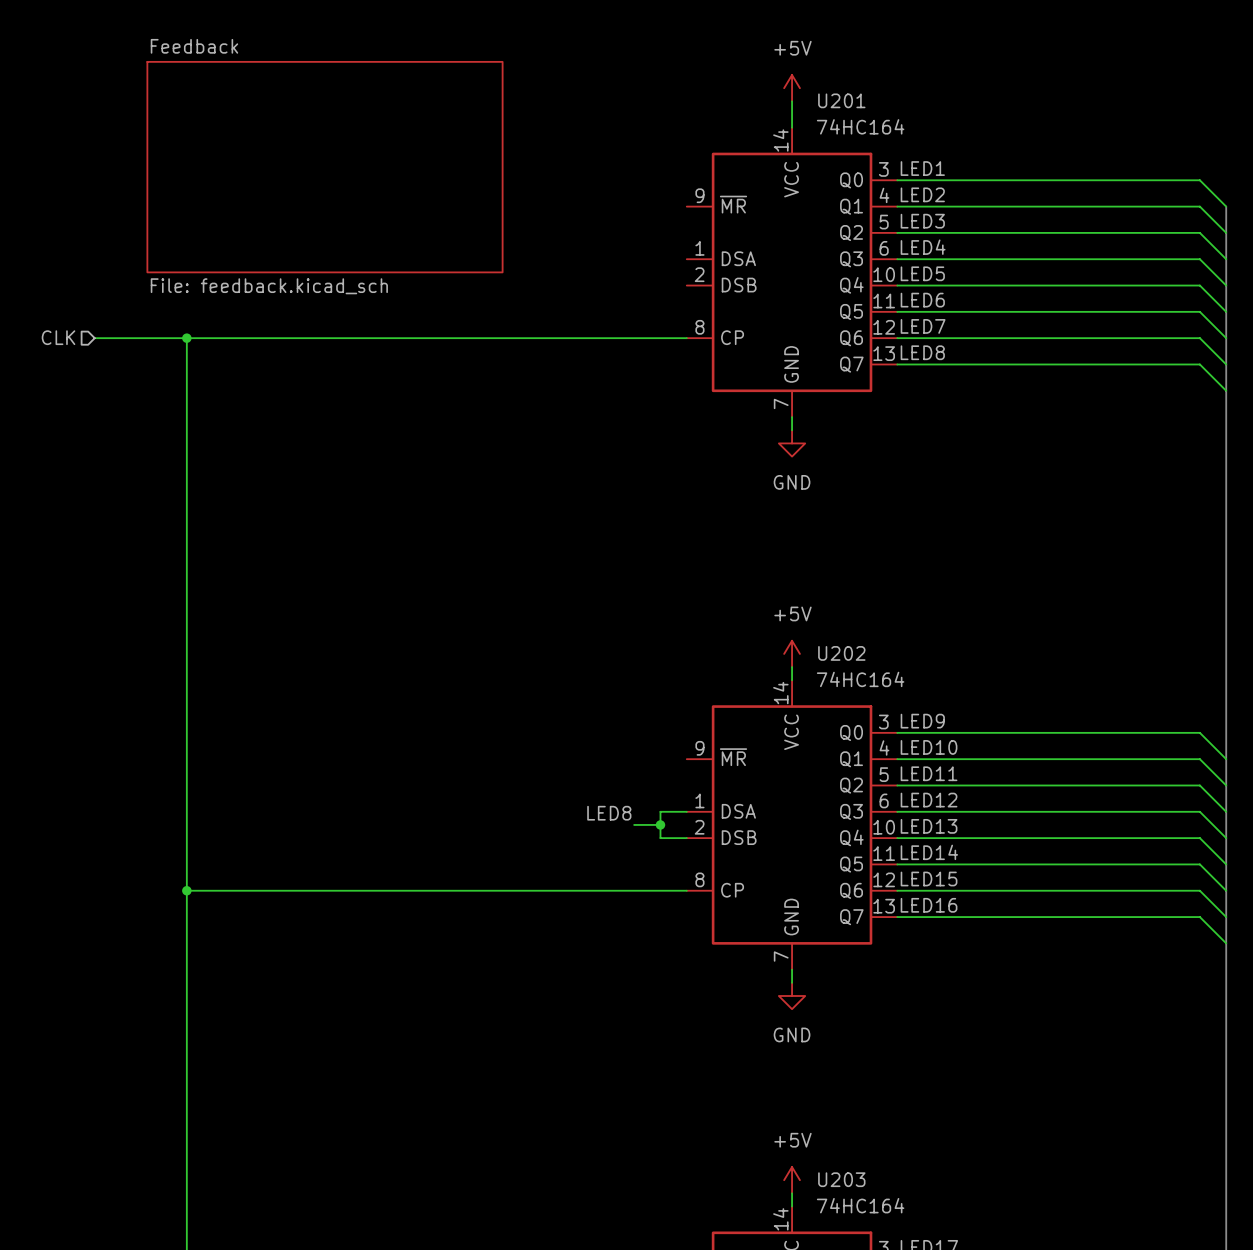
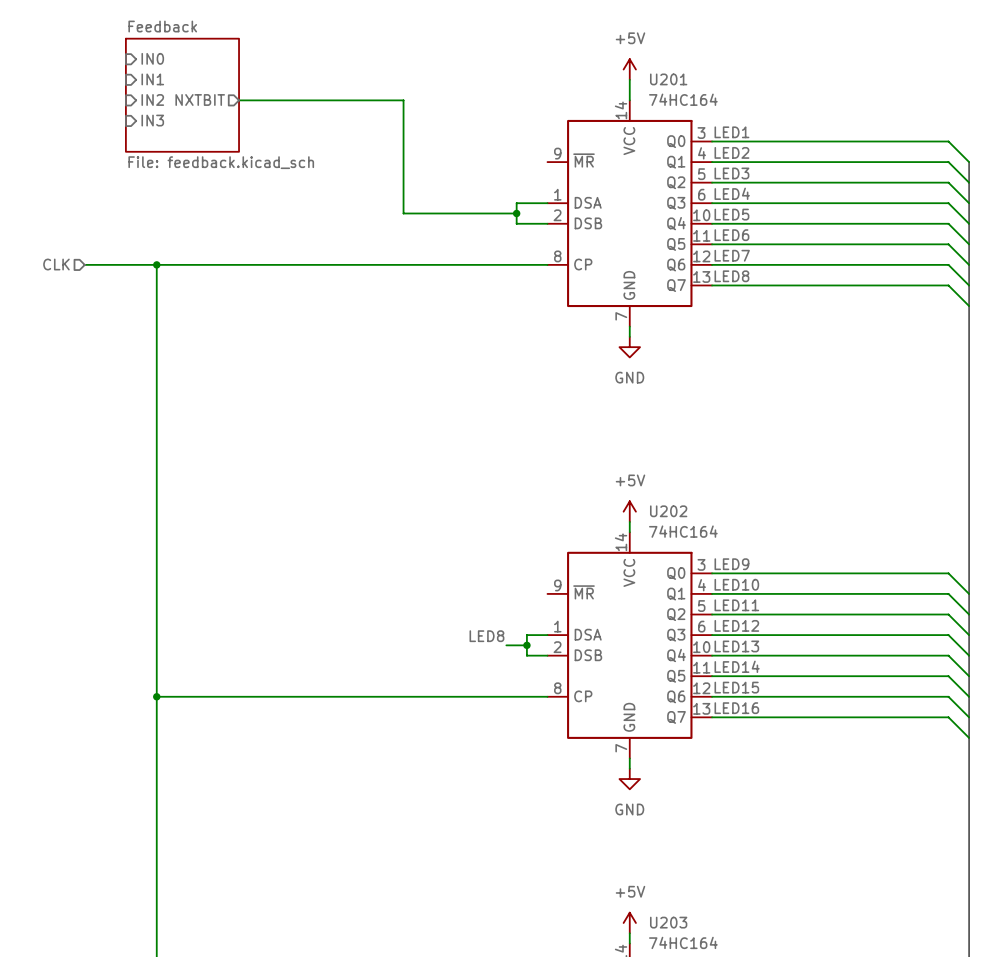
sheet pin: none -> IN0 (152, 58)
sheet pin: none -> IN1 (152, 79)
sheet Feedback: none -> File: feedback.kicad_sch (182, 95)
sheet pin: none -> IN2 (152, 99)
sheet pin: none -> NXTBIT (200, 99)
wire: none -> (239, 100) (403, 100) (403, 213) (516, 213)
sheet pin: none -> IN3 (152, 120)
sheet Feedback: File: feedback.kicad_sch (324, 167) -> none
wire: none -> (547, 203) (516, 203) (516, 223) (547, 223)
junction: none -> (516, 213)

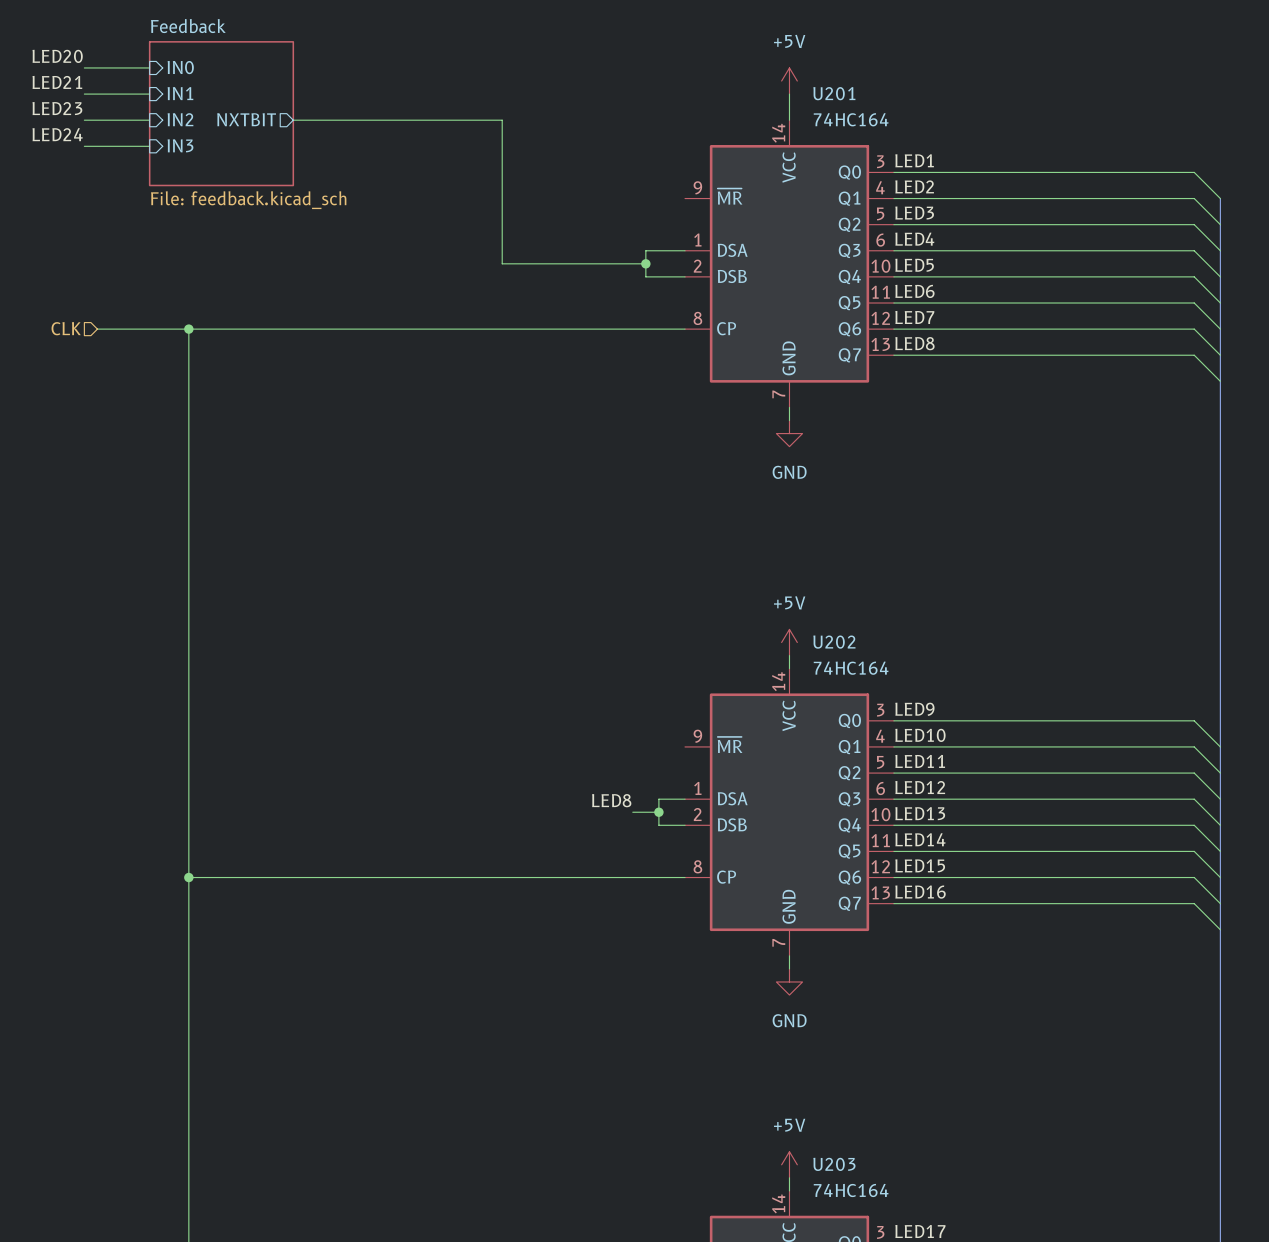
label: none -> LED20 (57, 56)
wire: none -> (84, 67) (149, 67)
label: none -> LED21 (57, 82)
wire: none -> (84, 94) (149, 94)
label: none -> LED23 (57, 108)
wire: none -> (84, 120) (149, 120)
label: none -> LED24 (57, 134)
wire: none -> (84, 146) (149, 146)

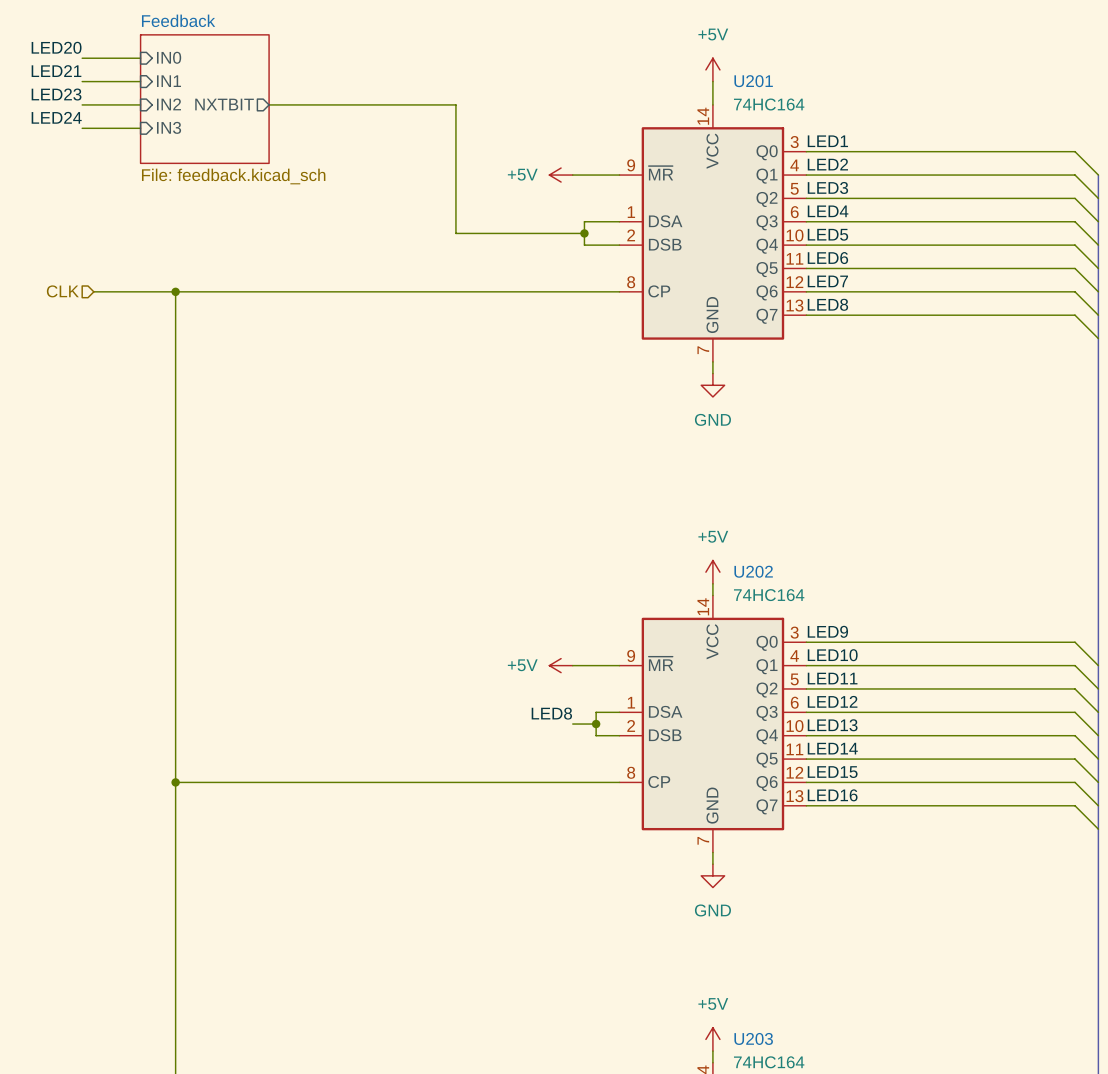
power symbol: none -> +5V (561, 175)
wire: none -> (572, 175) (619, 175)
power symbol: none -> +5V (561, 665)
wire: none -> (572, 665) (619, 665)

